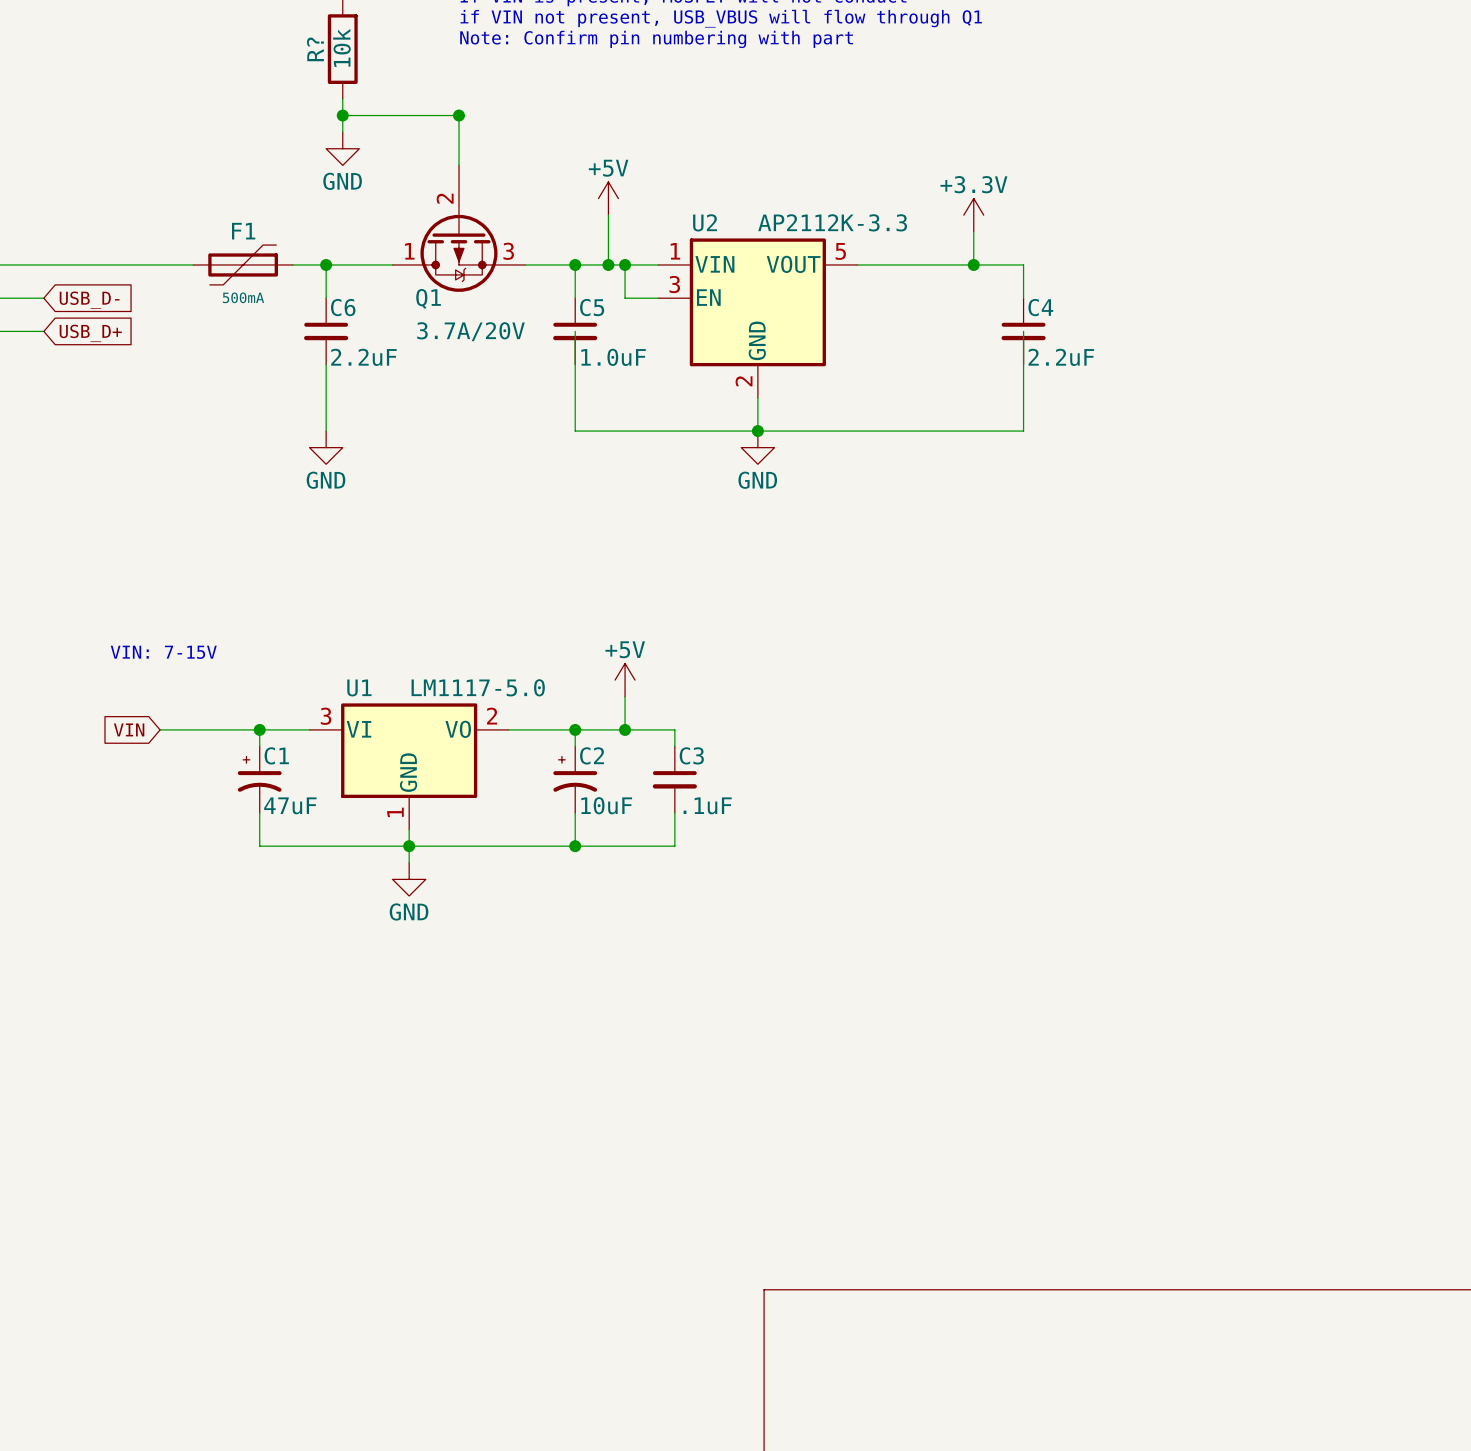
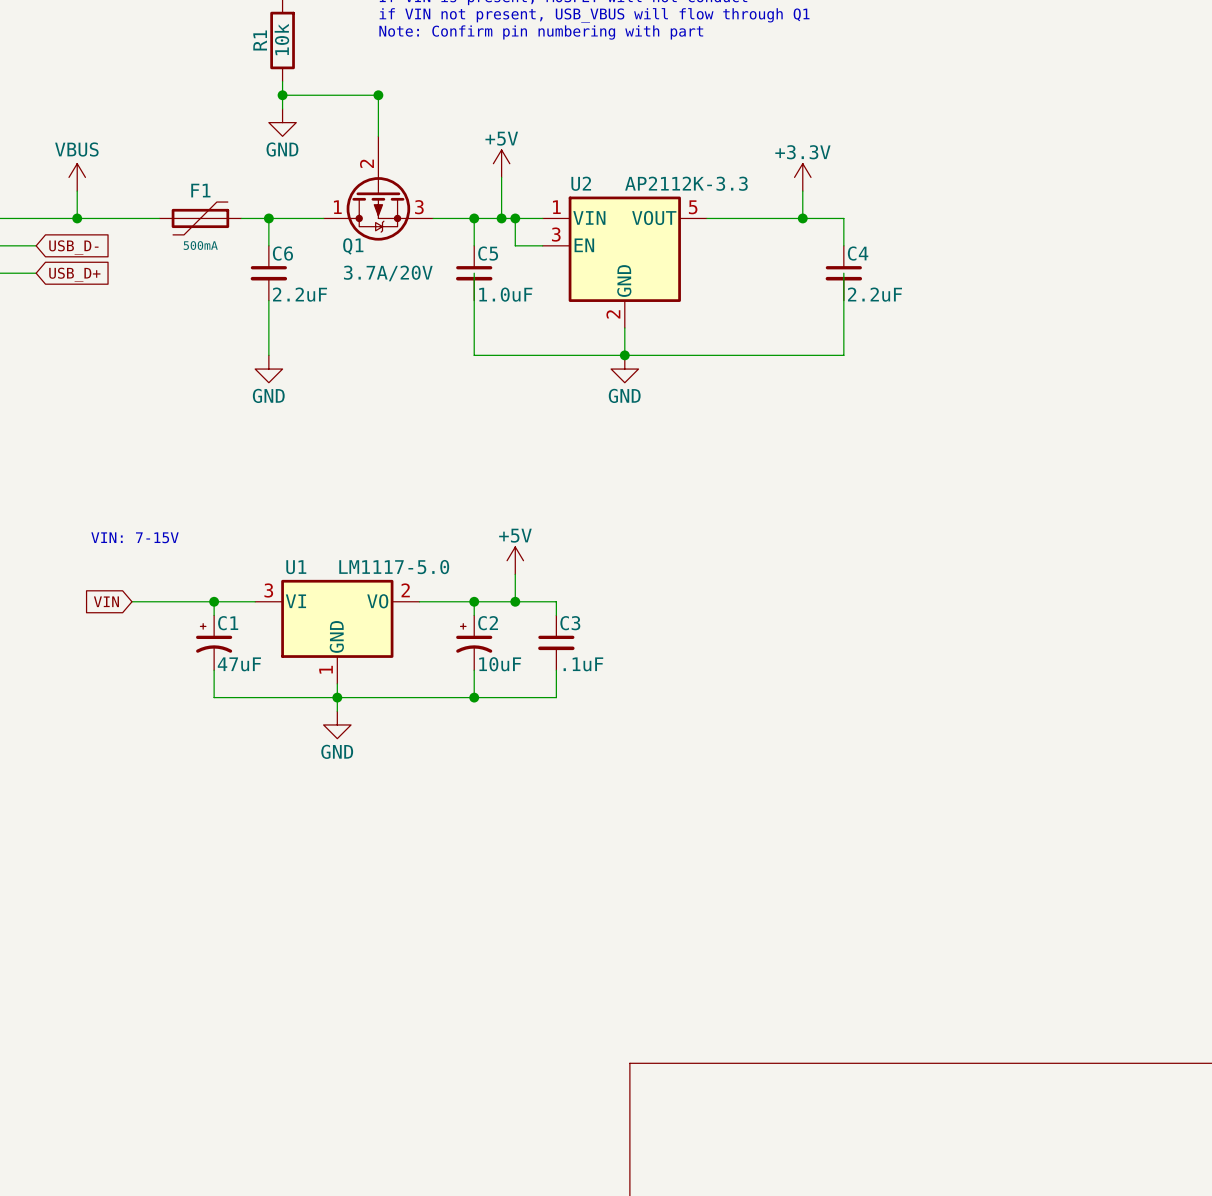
R? name: R? (315, 49) -> R1 (260, 40)
power symbol: none -> VBUS (77, 177)
wire: none -> (77, 191) (77, 218)
junction: none -> (77, 218)

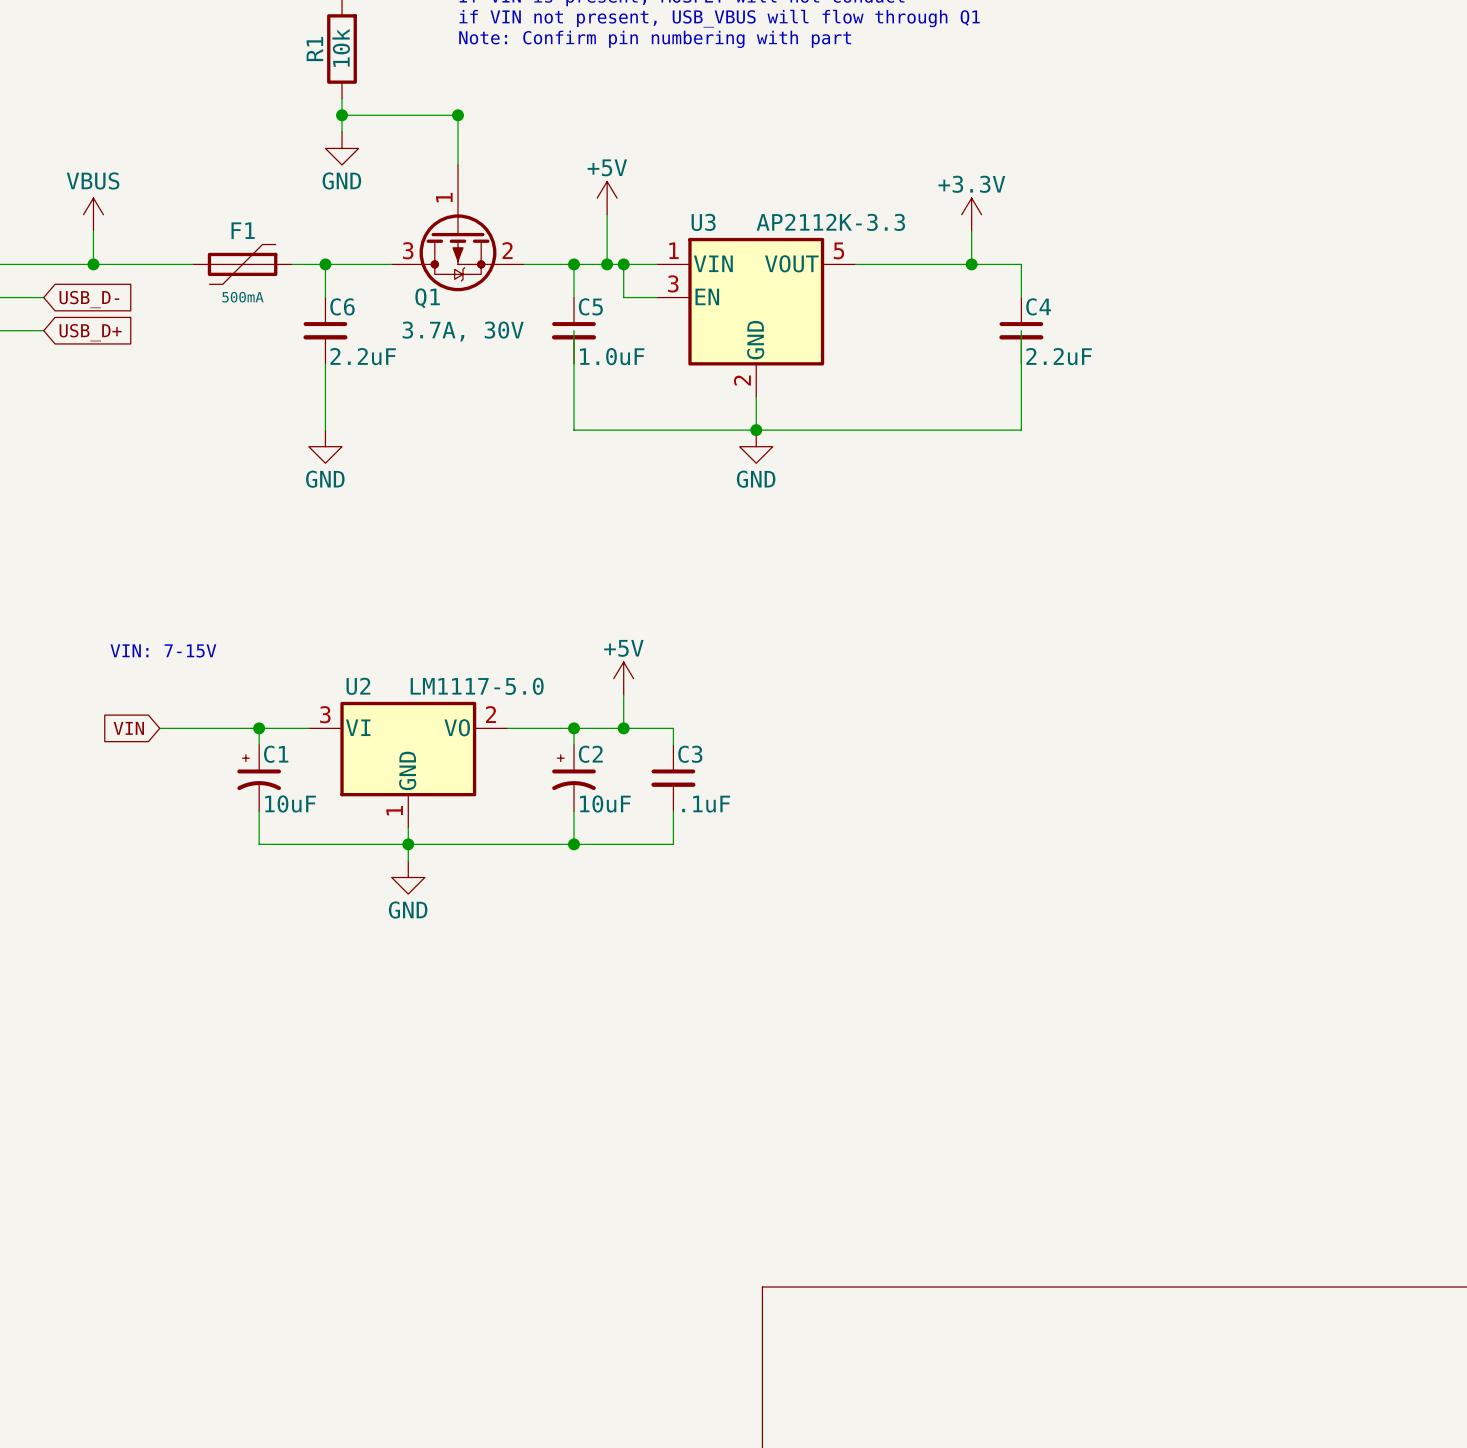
Q1 pin number: 2 (366, 163) -> 1 (444, 197)
U2 name: U2 (581, 183) -> U3 (703, 222)
Q1 pin number: 1 (337, 207) -> 3 (408, 250)
Q1 pin number: 3 (419, 207) -> 2 (507, 250)
Q1 value: 3.7A/20V (388, 273) -> 3.7A, 30V (463, 331)
U1 name: U1 (296, 567) -> U2 (358, 686)
C1 value: 47uF (239, 664) -> 10uF (290, 803)

